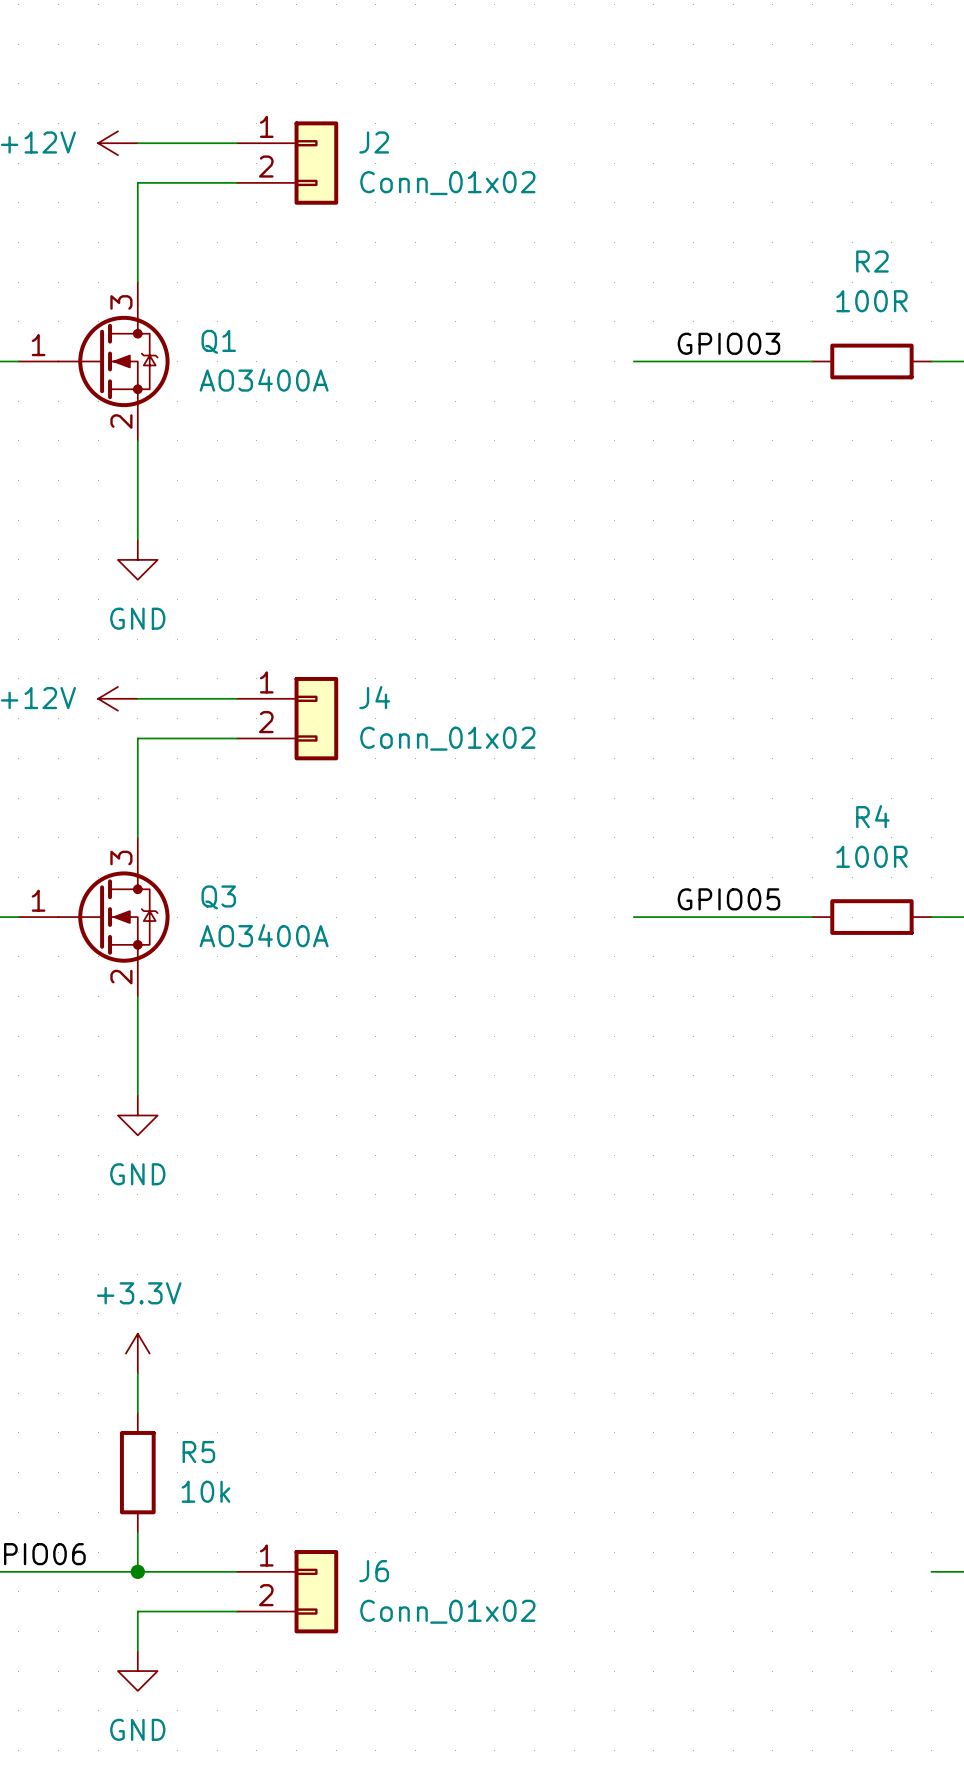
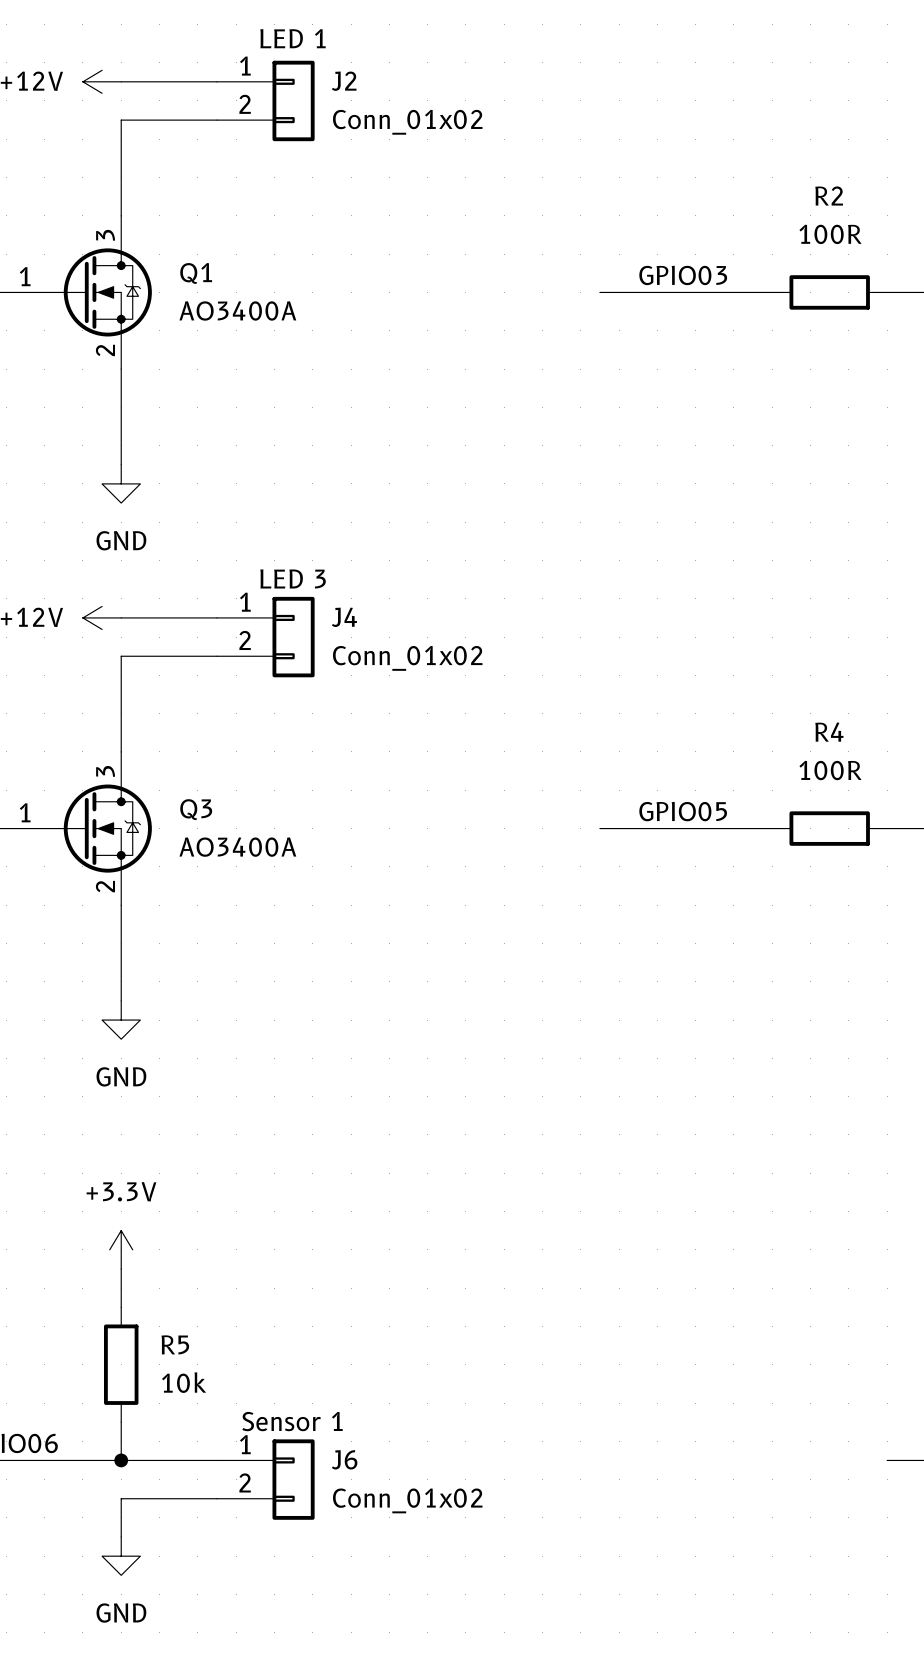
J2 text: none -> LED 1 (292, 38)
J4 text: none -> LED 3 (293, 578)
J6 text: none -> Sensor 1 (292, 1421)

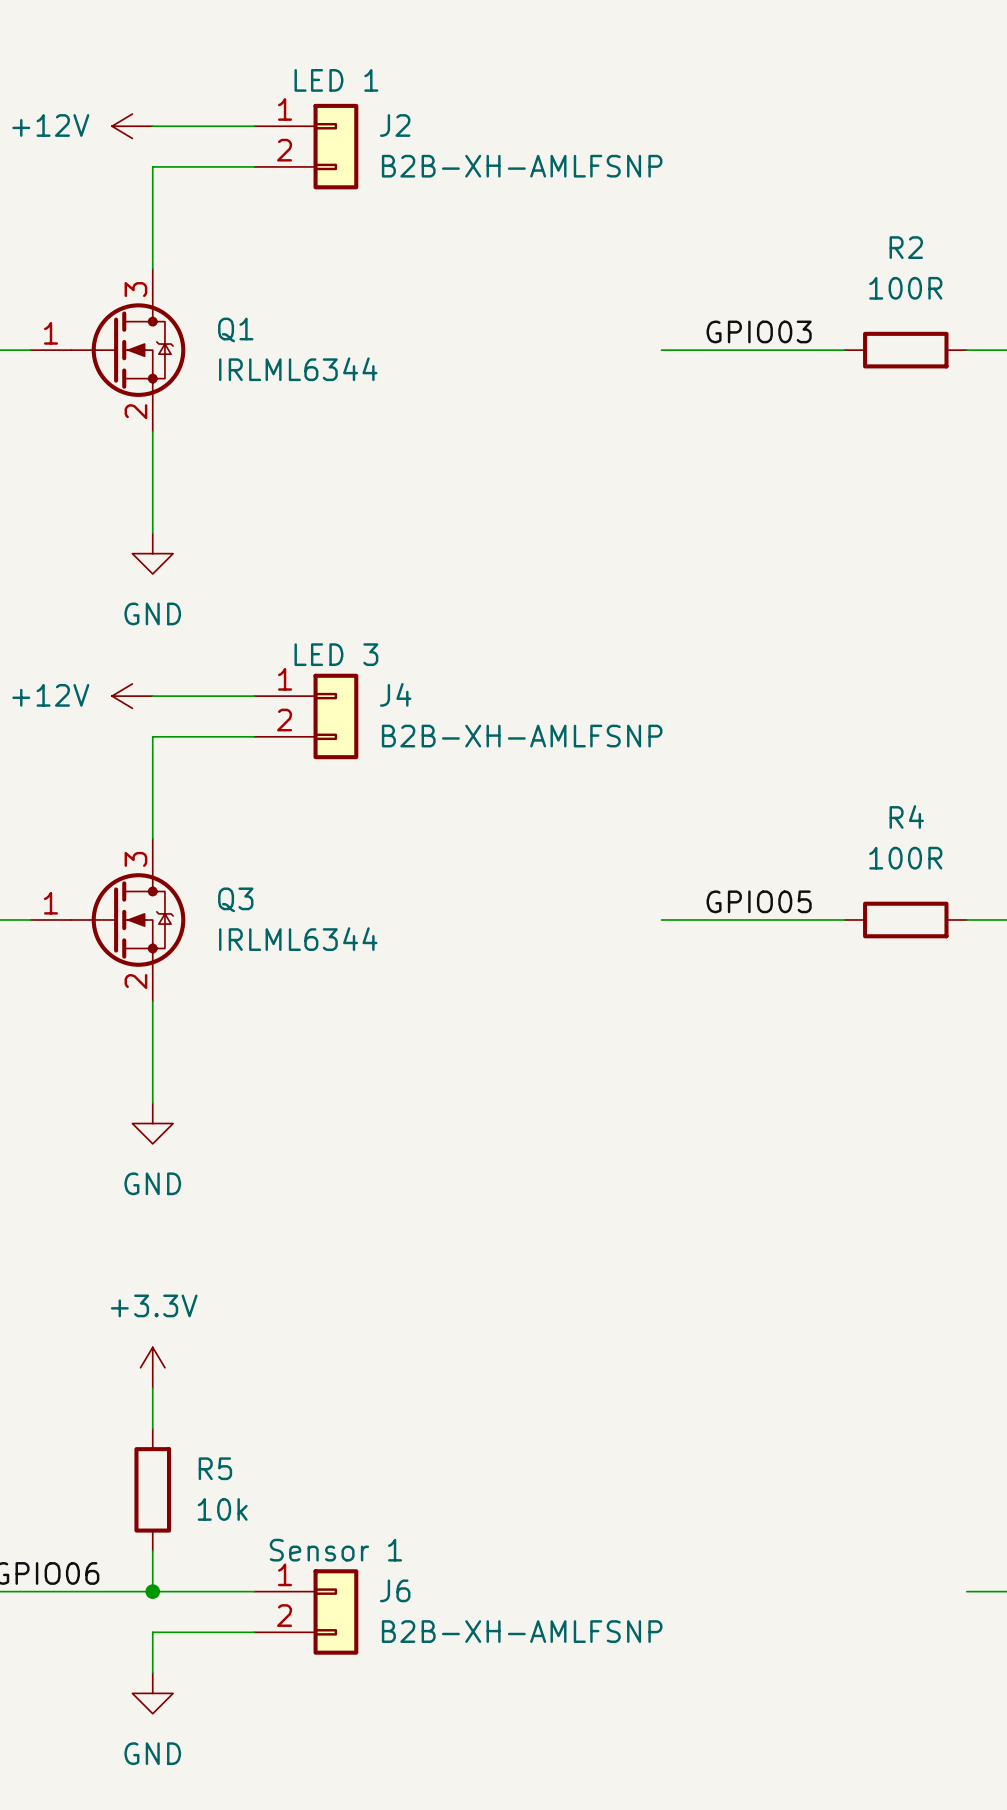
J2 value: Conn_01x02 (407, 122) -> B2B-XH-AMLFSNP (522, 166)
Q1 value: AO3400A (237, 310) -> IRLML6344 (298, 369)
J4 value: Conn_01x02 (407, 658) -> B2B-XH-AMLFSNP (522, 736)
Q3 value: AO3400A (237, 847) -> IRLML6344 (298, 939)
J6 value: Conn_01x02 (407, 1500) -> B2B-XH-AMLFSNP (522, 1631)

